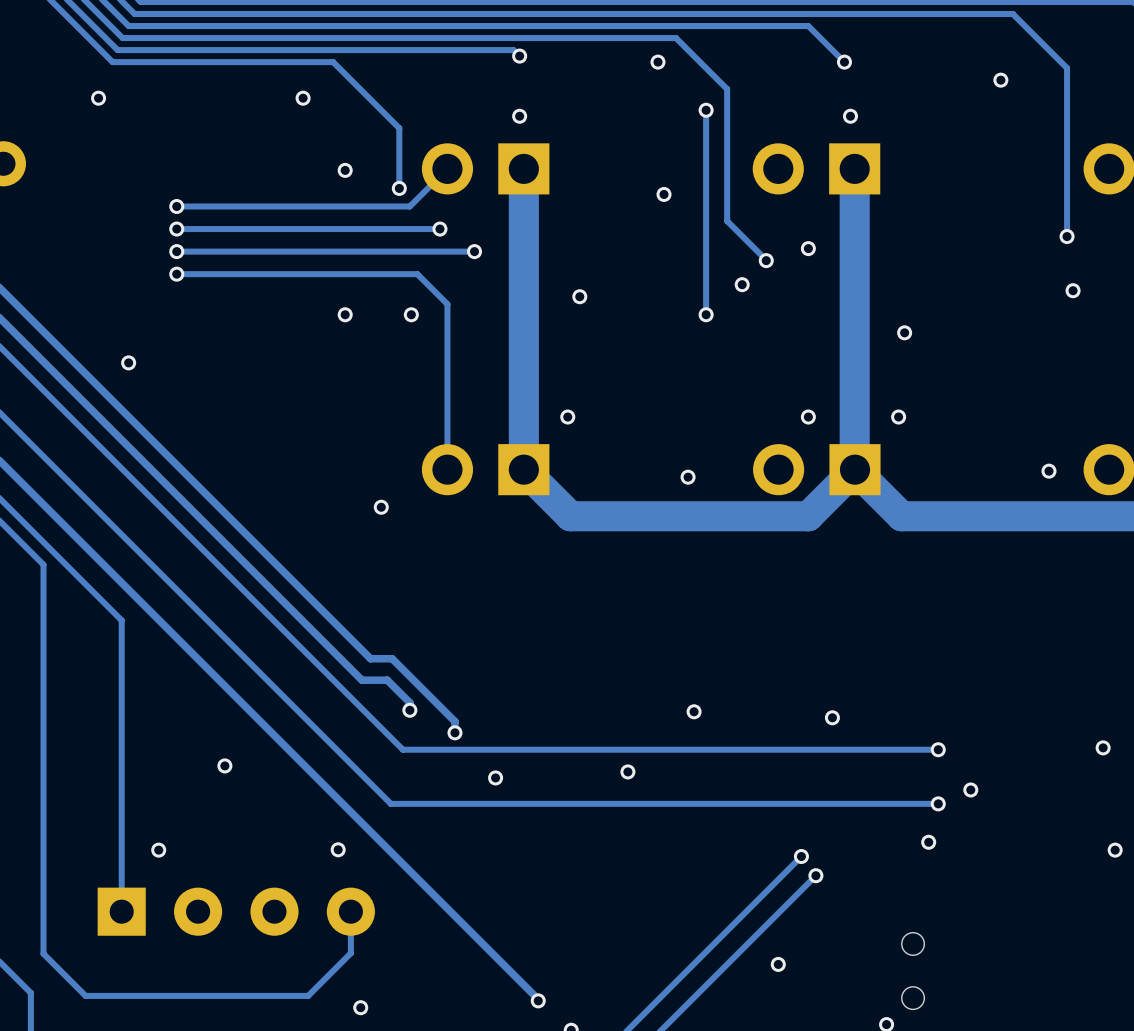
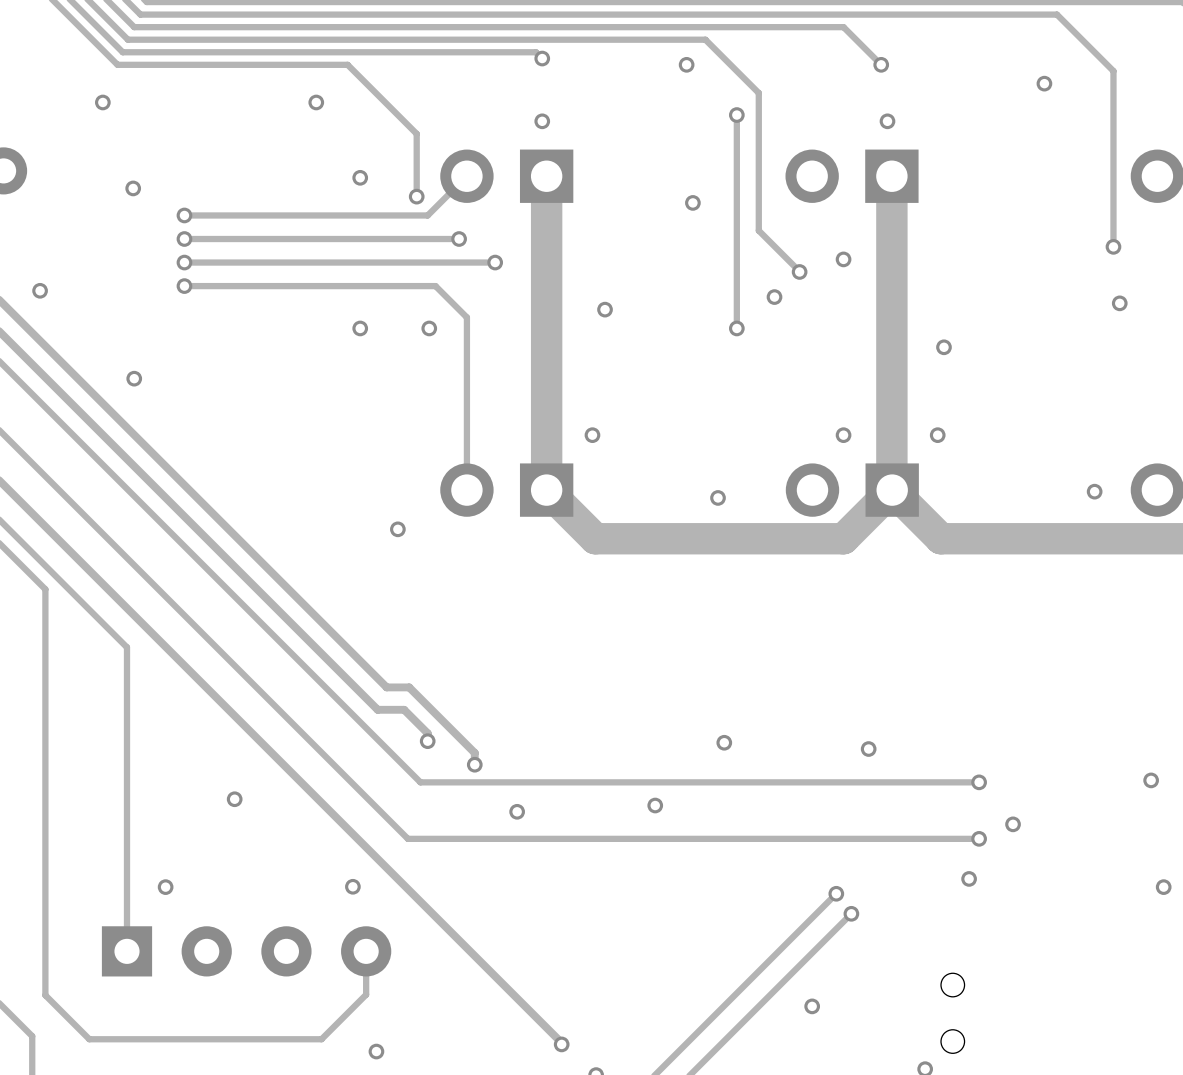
via: none -> (133, 188)
via: none -> (40, 290)

